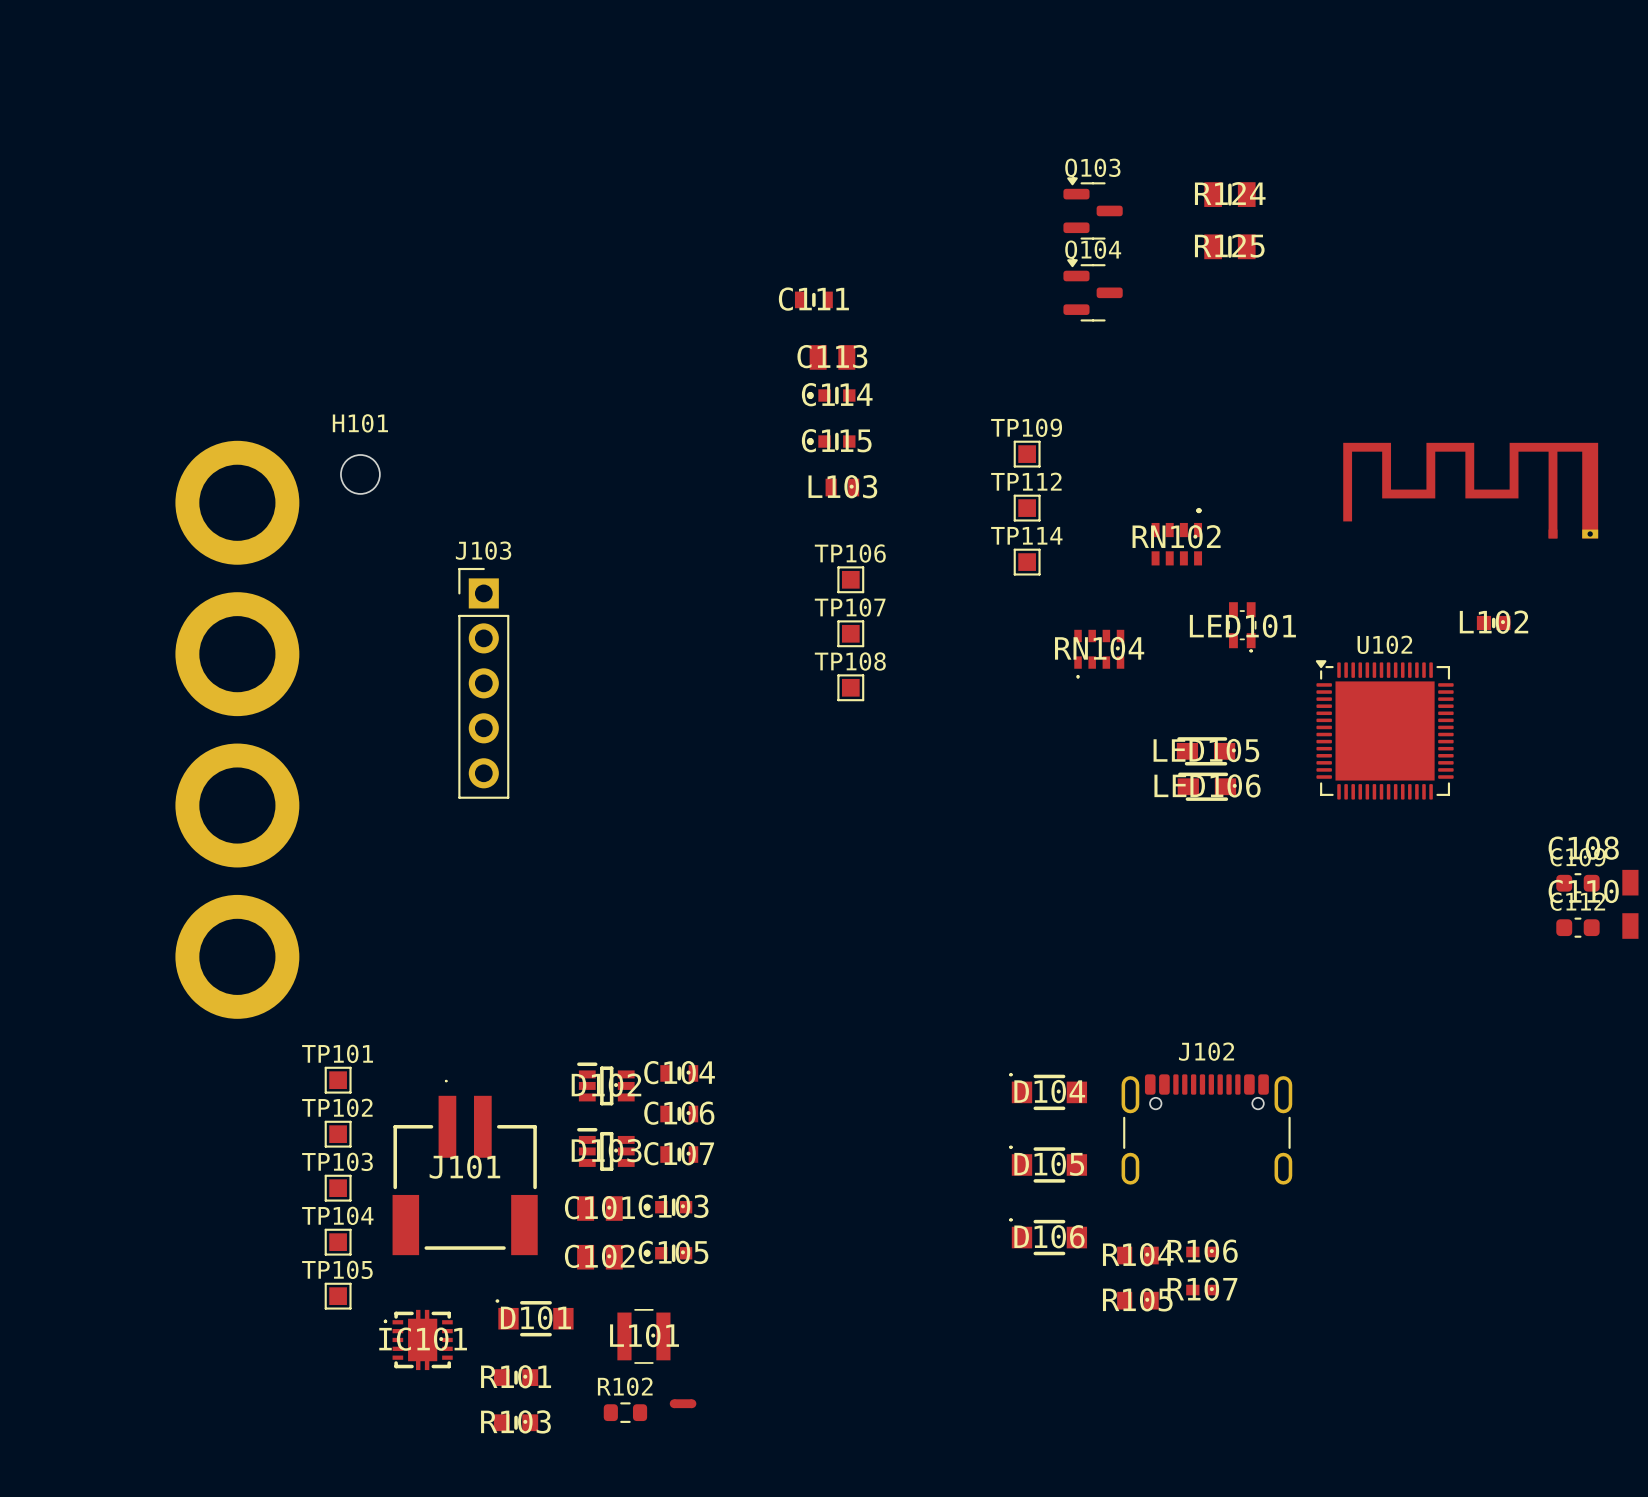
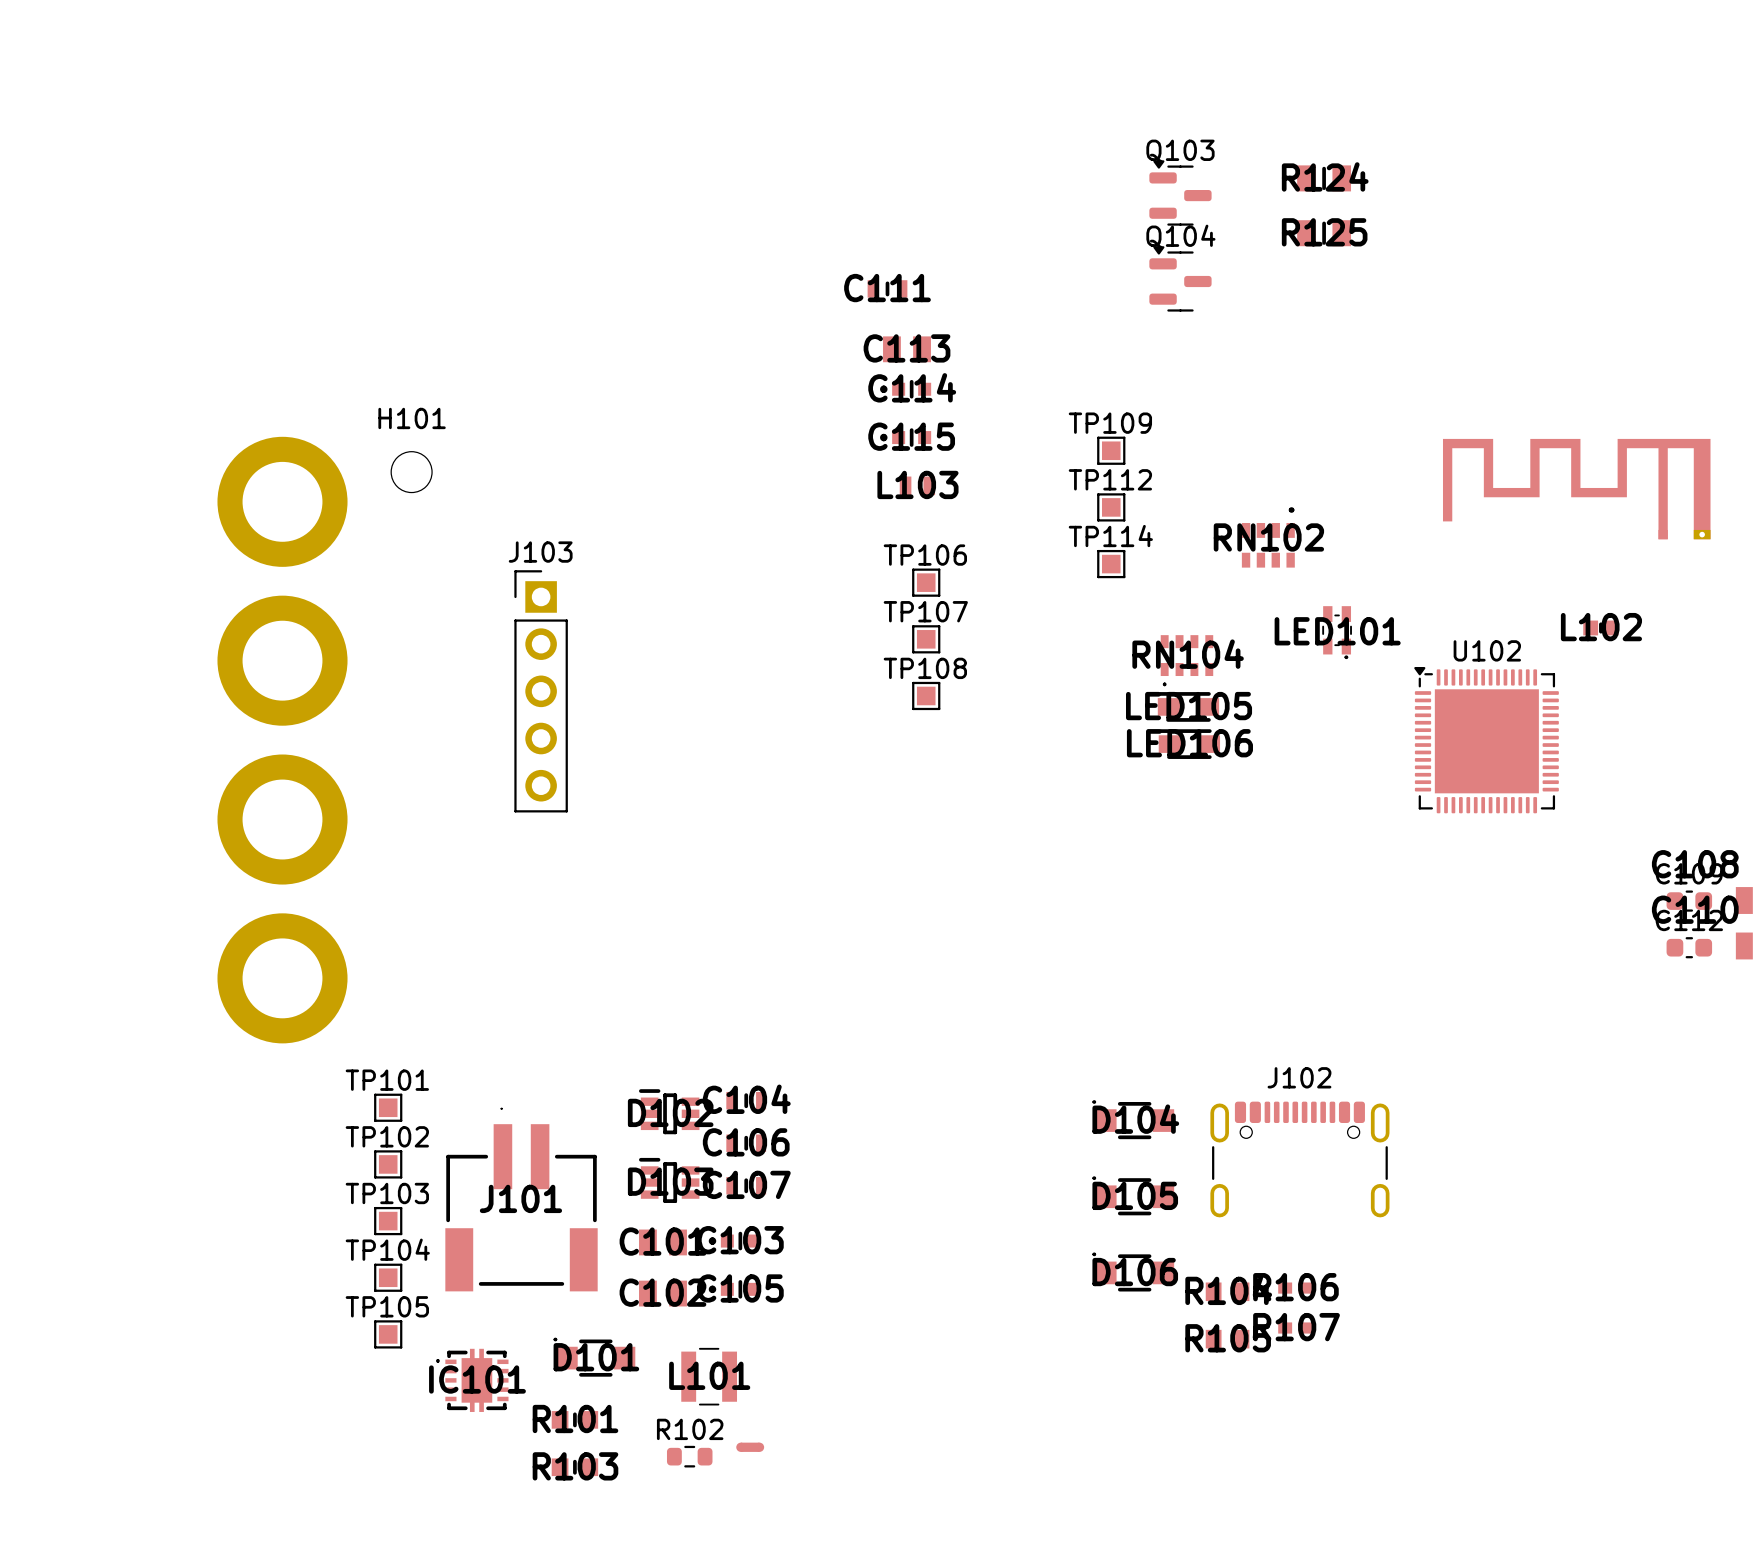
LED105 position: (1206, 751) -> (1188, 706)
LED106 position: (1206, 786) -> (1189, 744)

